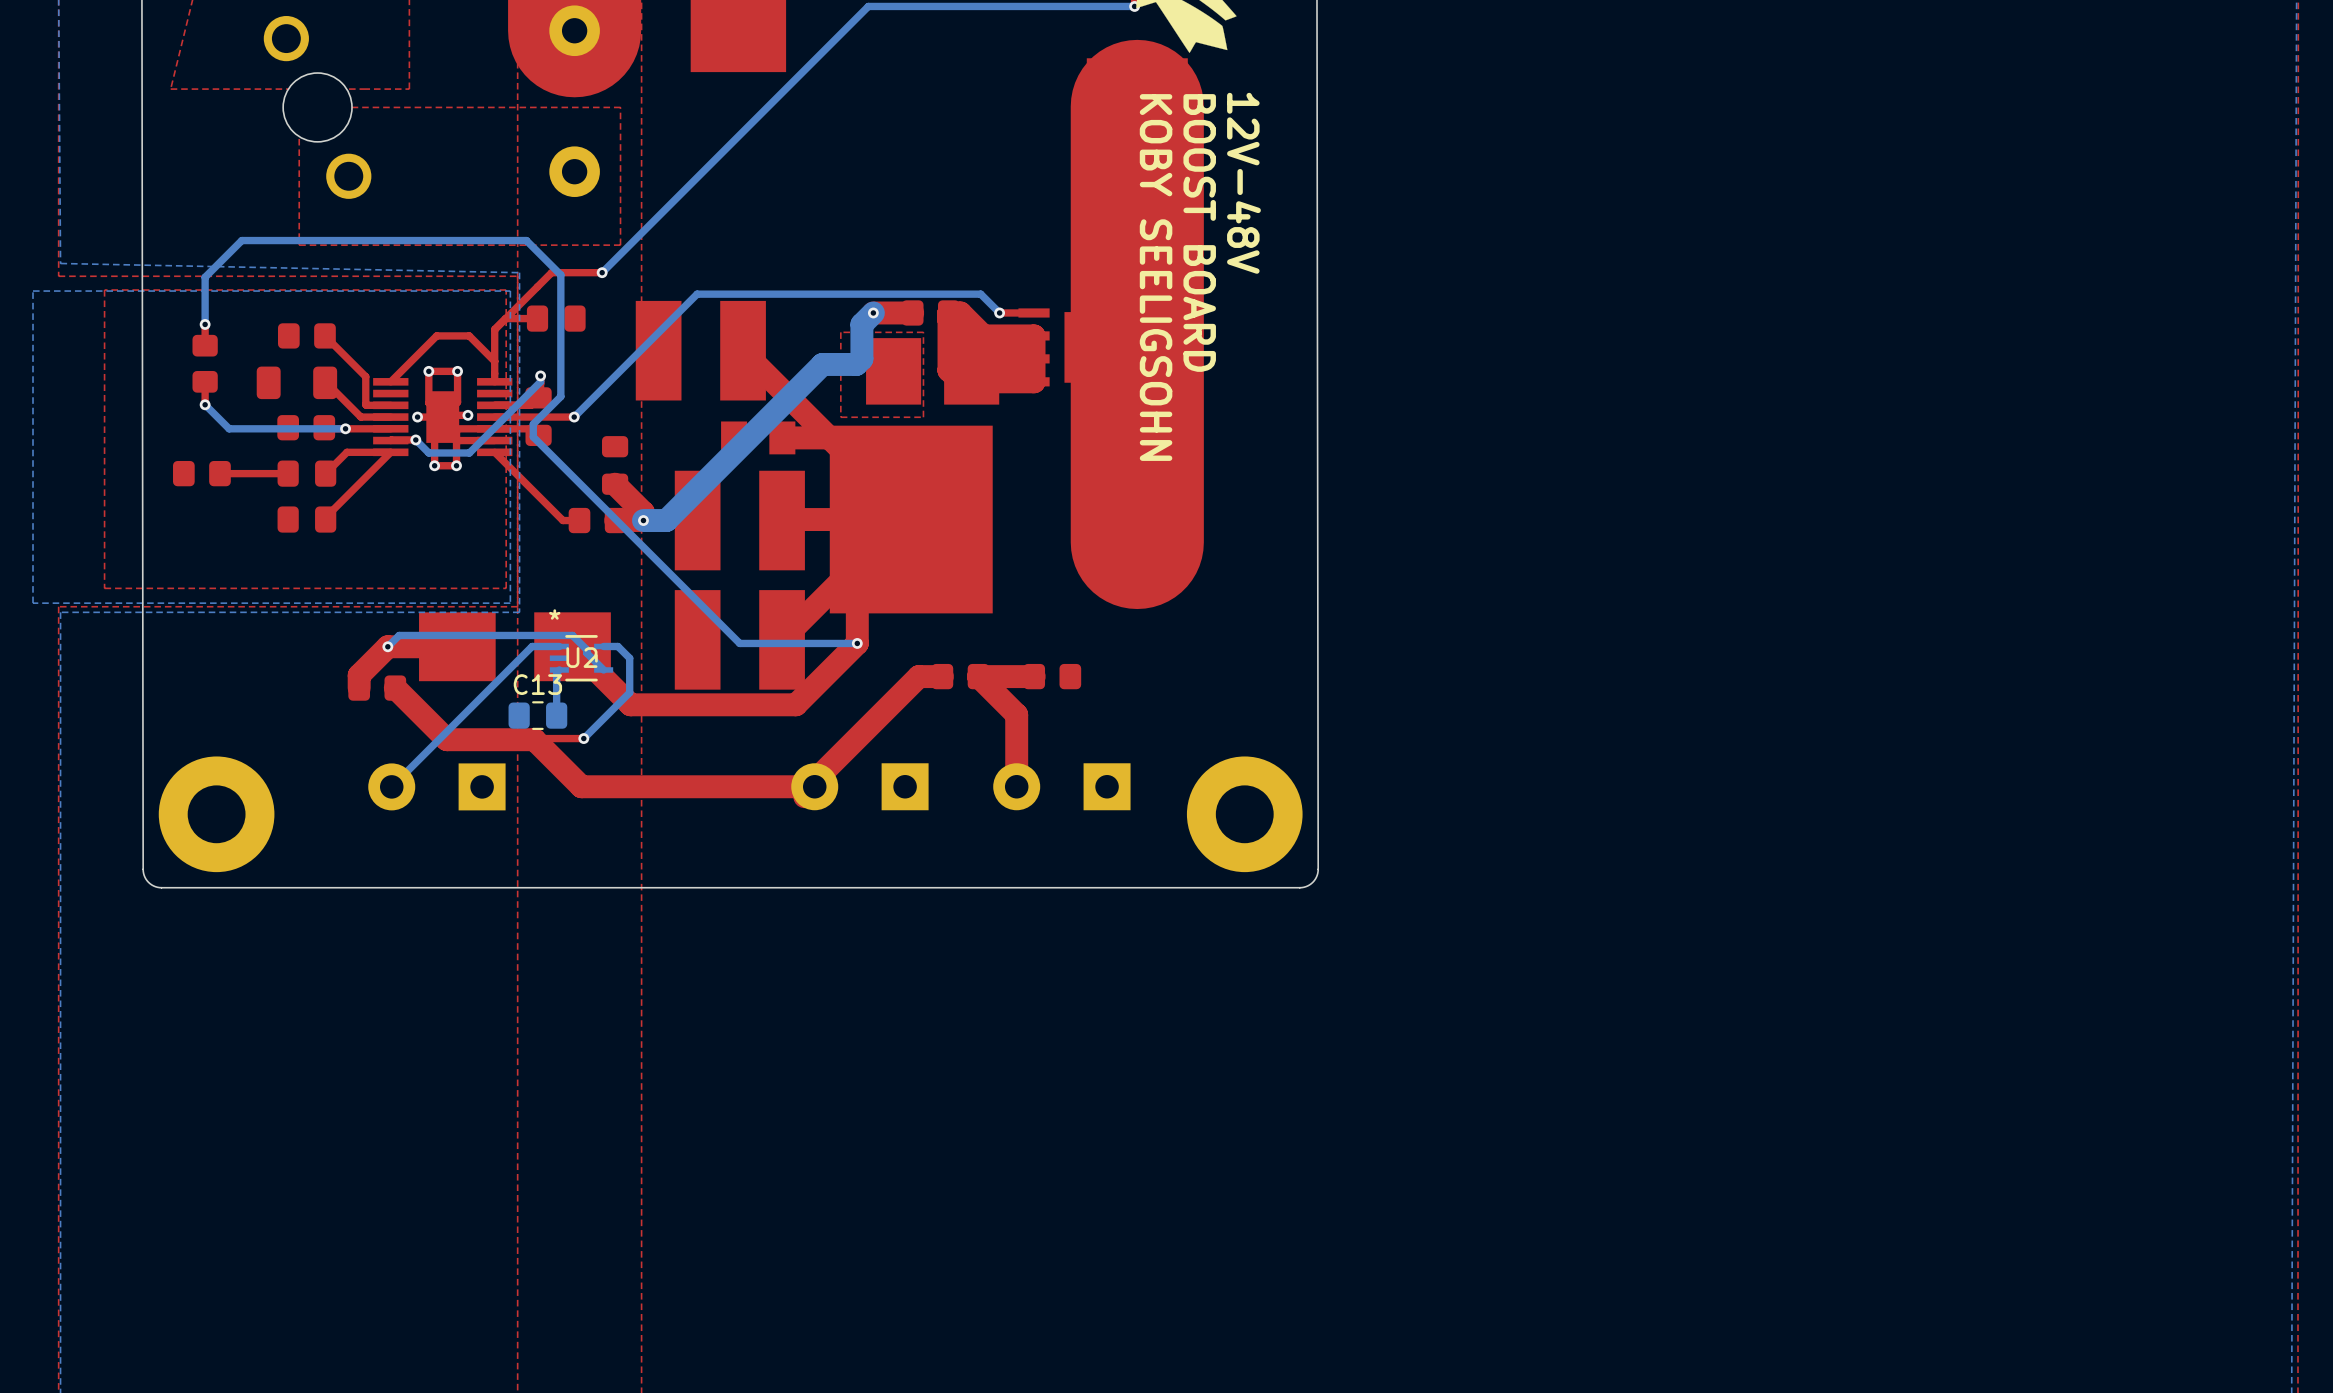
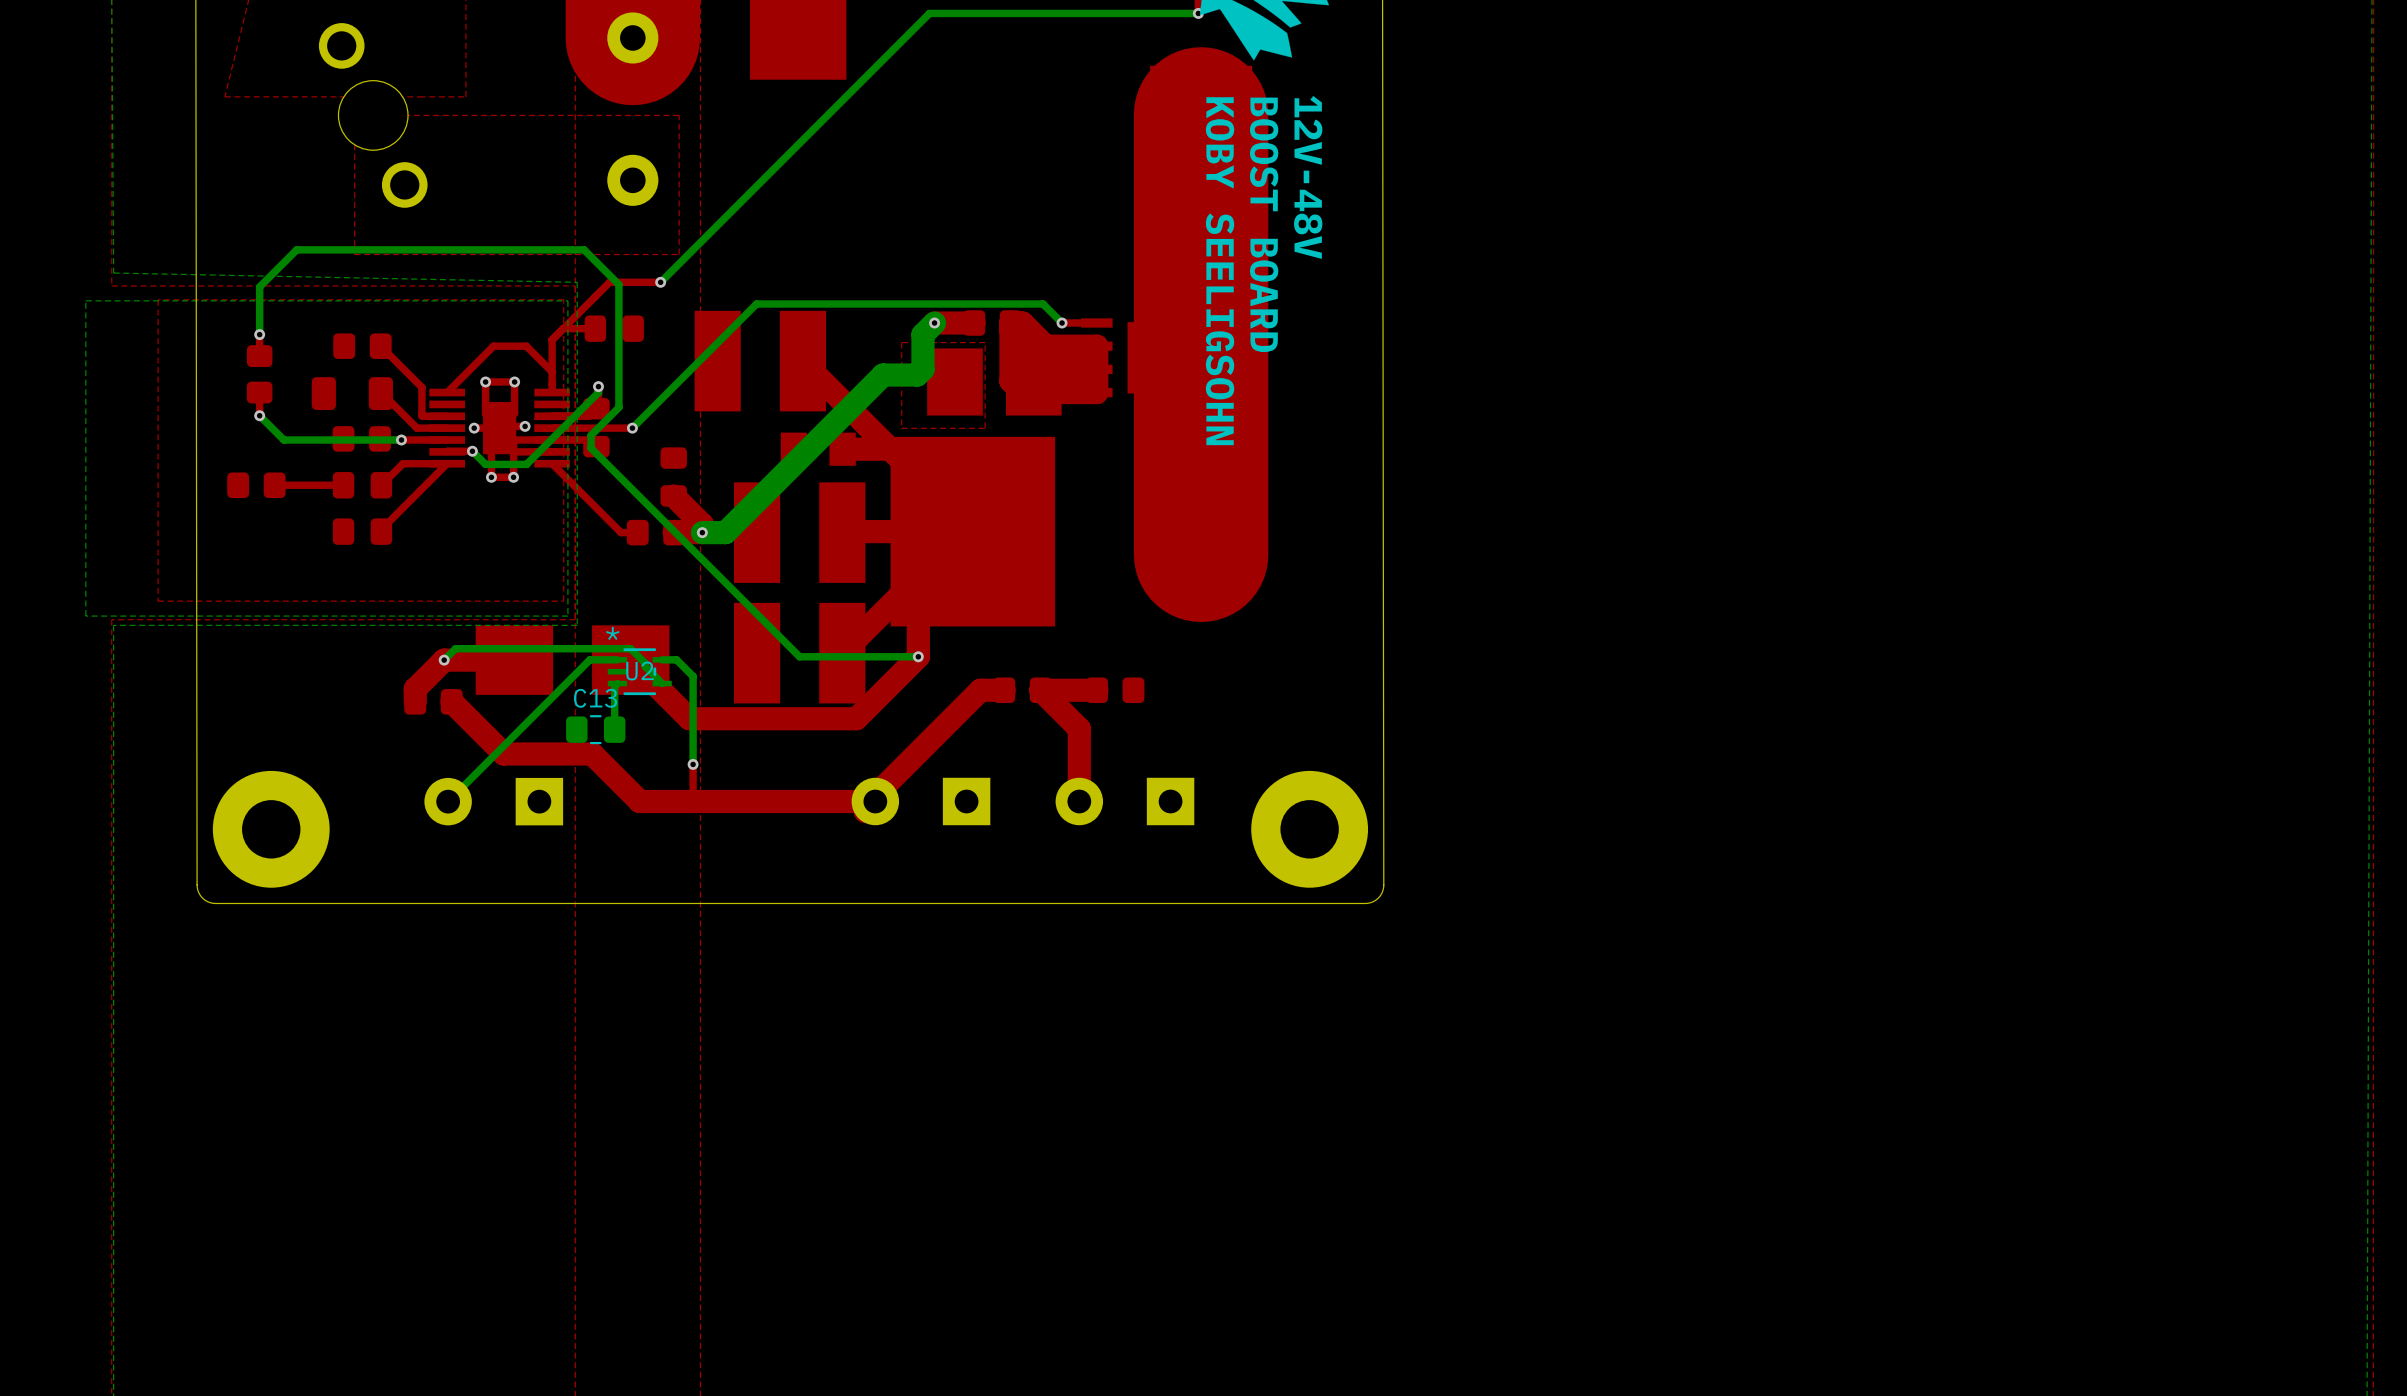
bottom track: (629, 658) (629, 692) (583, 738) -> (688, 671) (693, 676) (693, 764)
top track: (583, 738) (534, 739) -> none
via position: (583, 738) -> (693, 764)
top track: none -> (693, 764) (693, 801)

